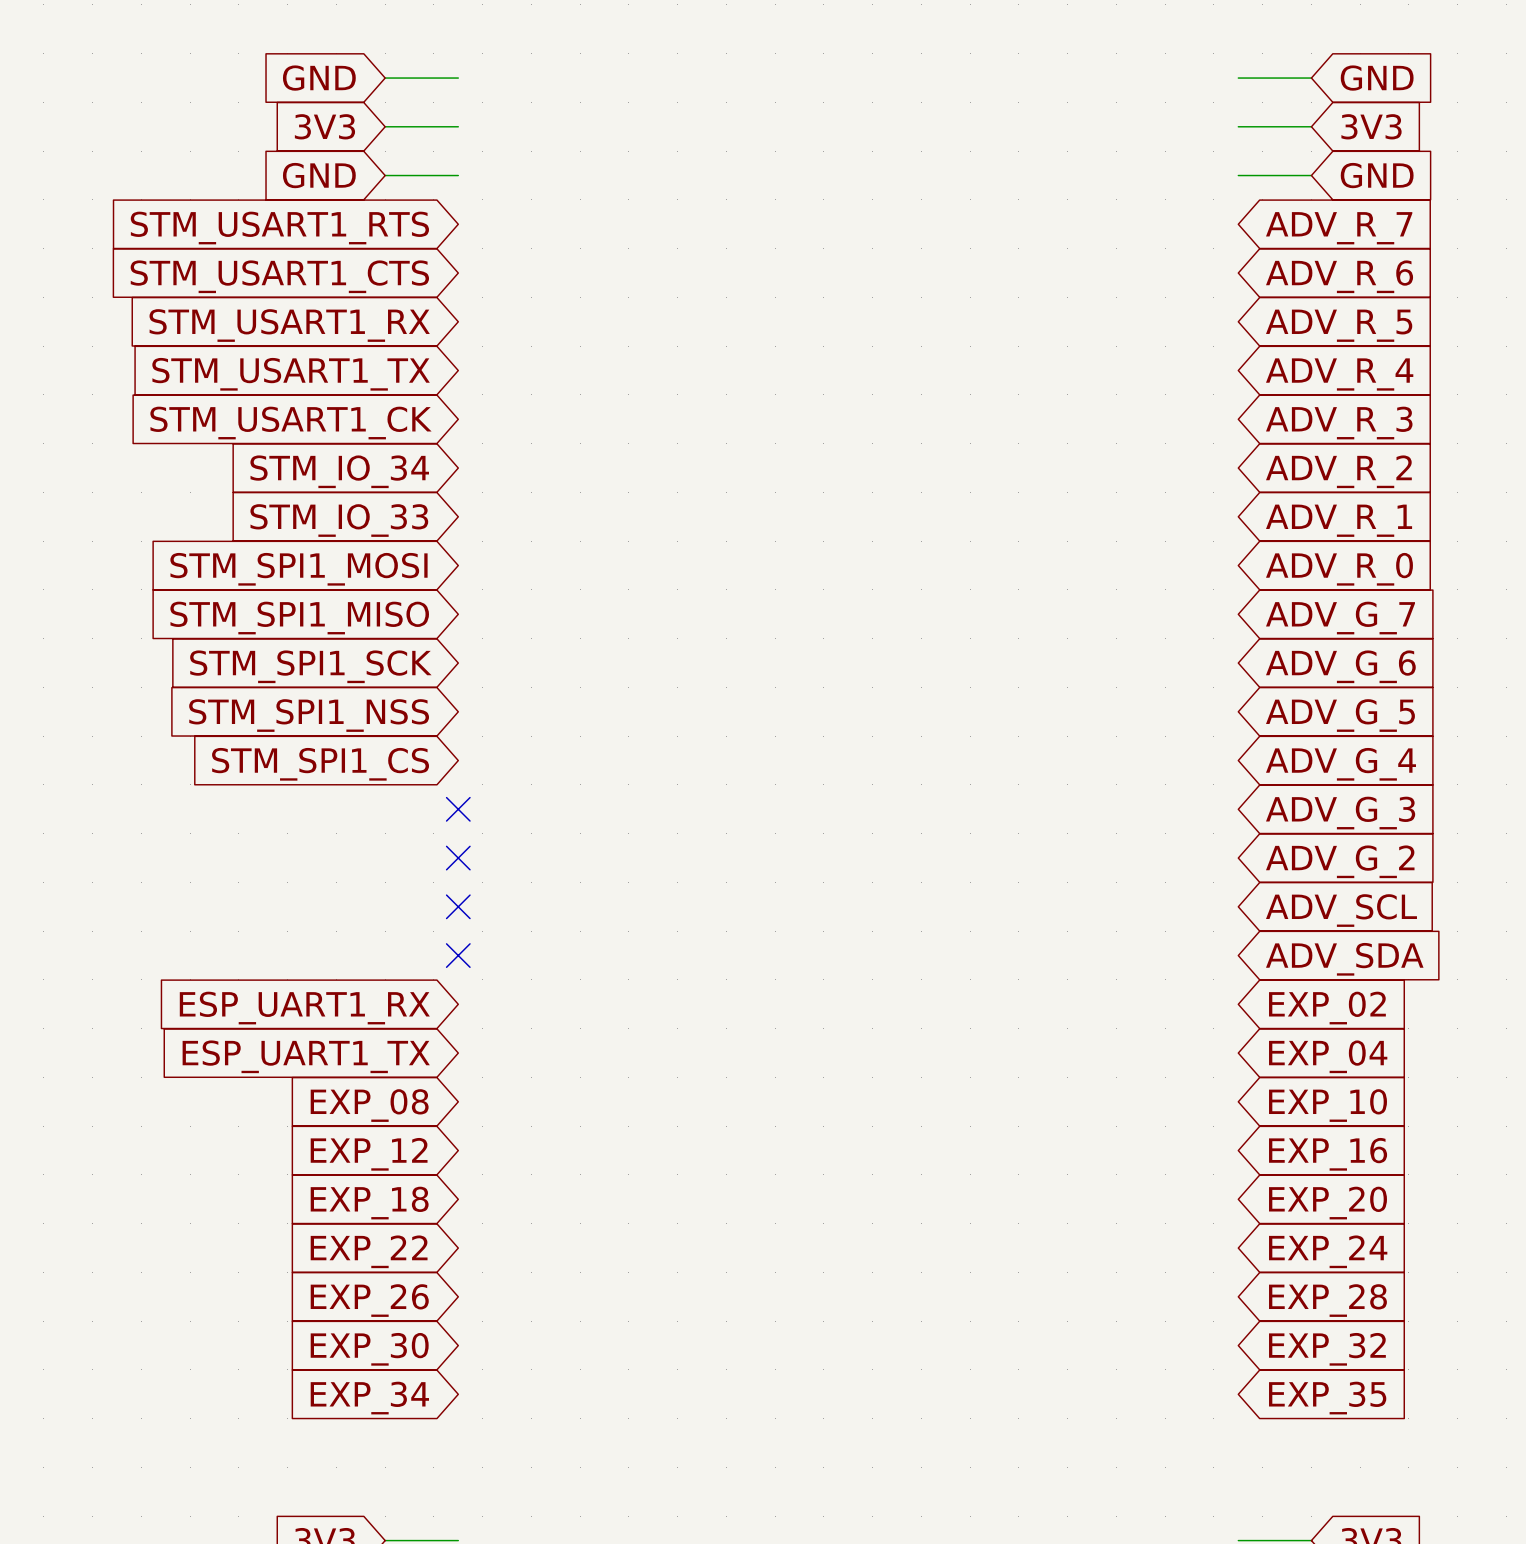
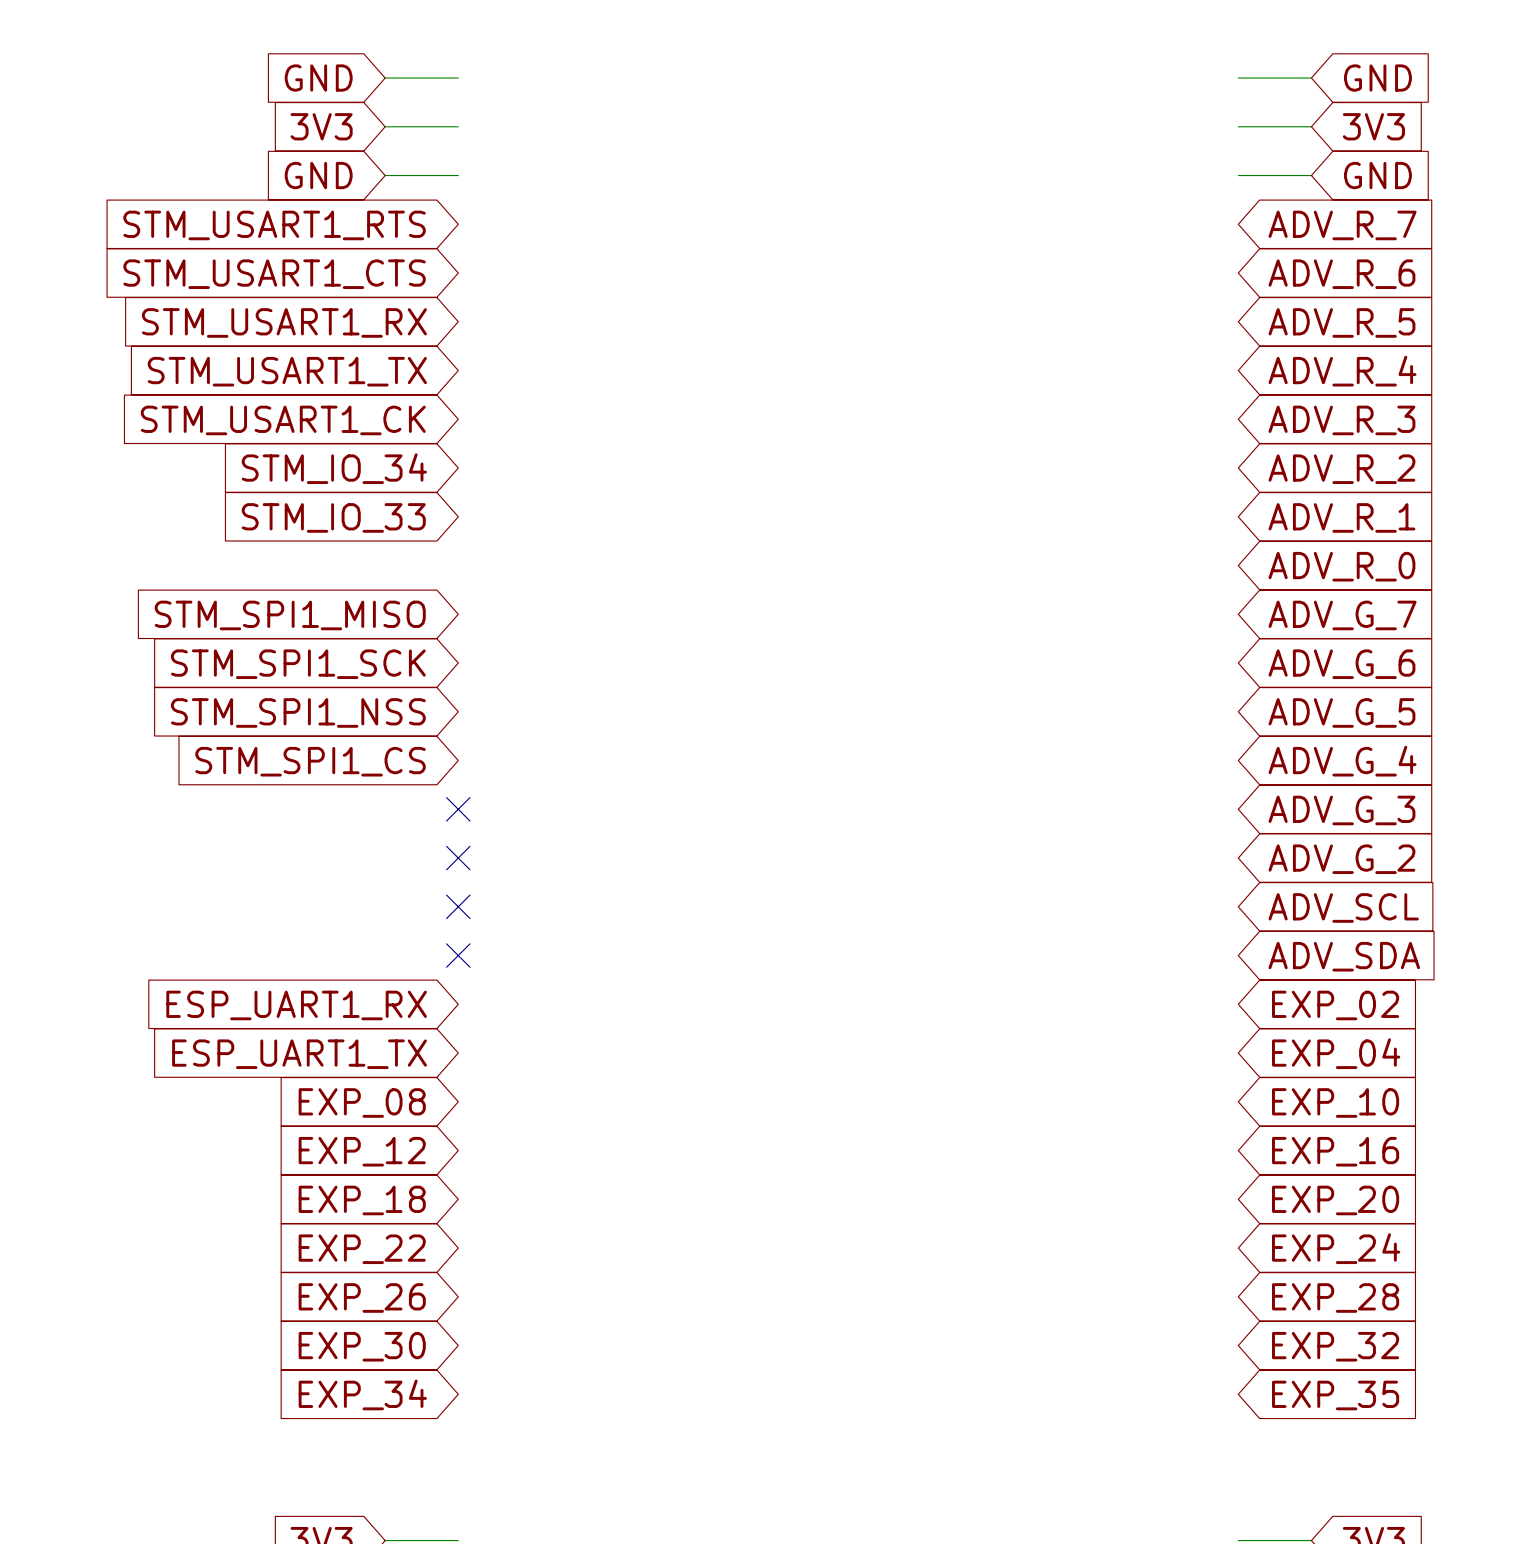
global label: STM_SPI1_MOSI (298, 569) -> none

